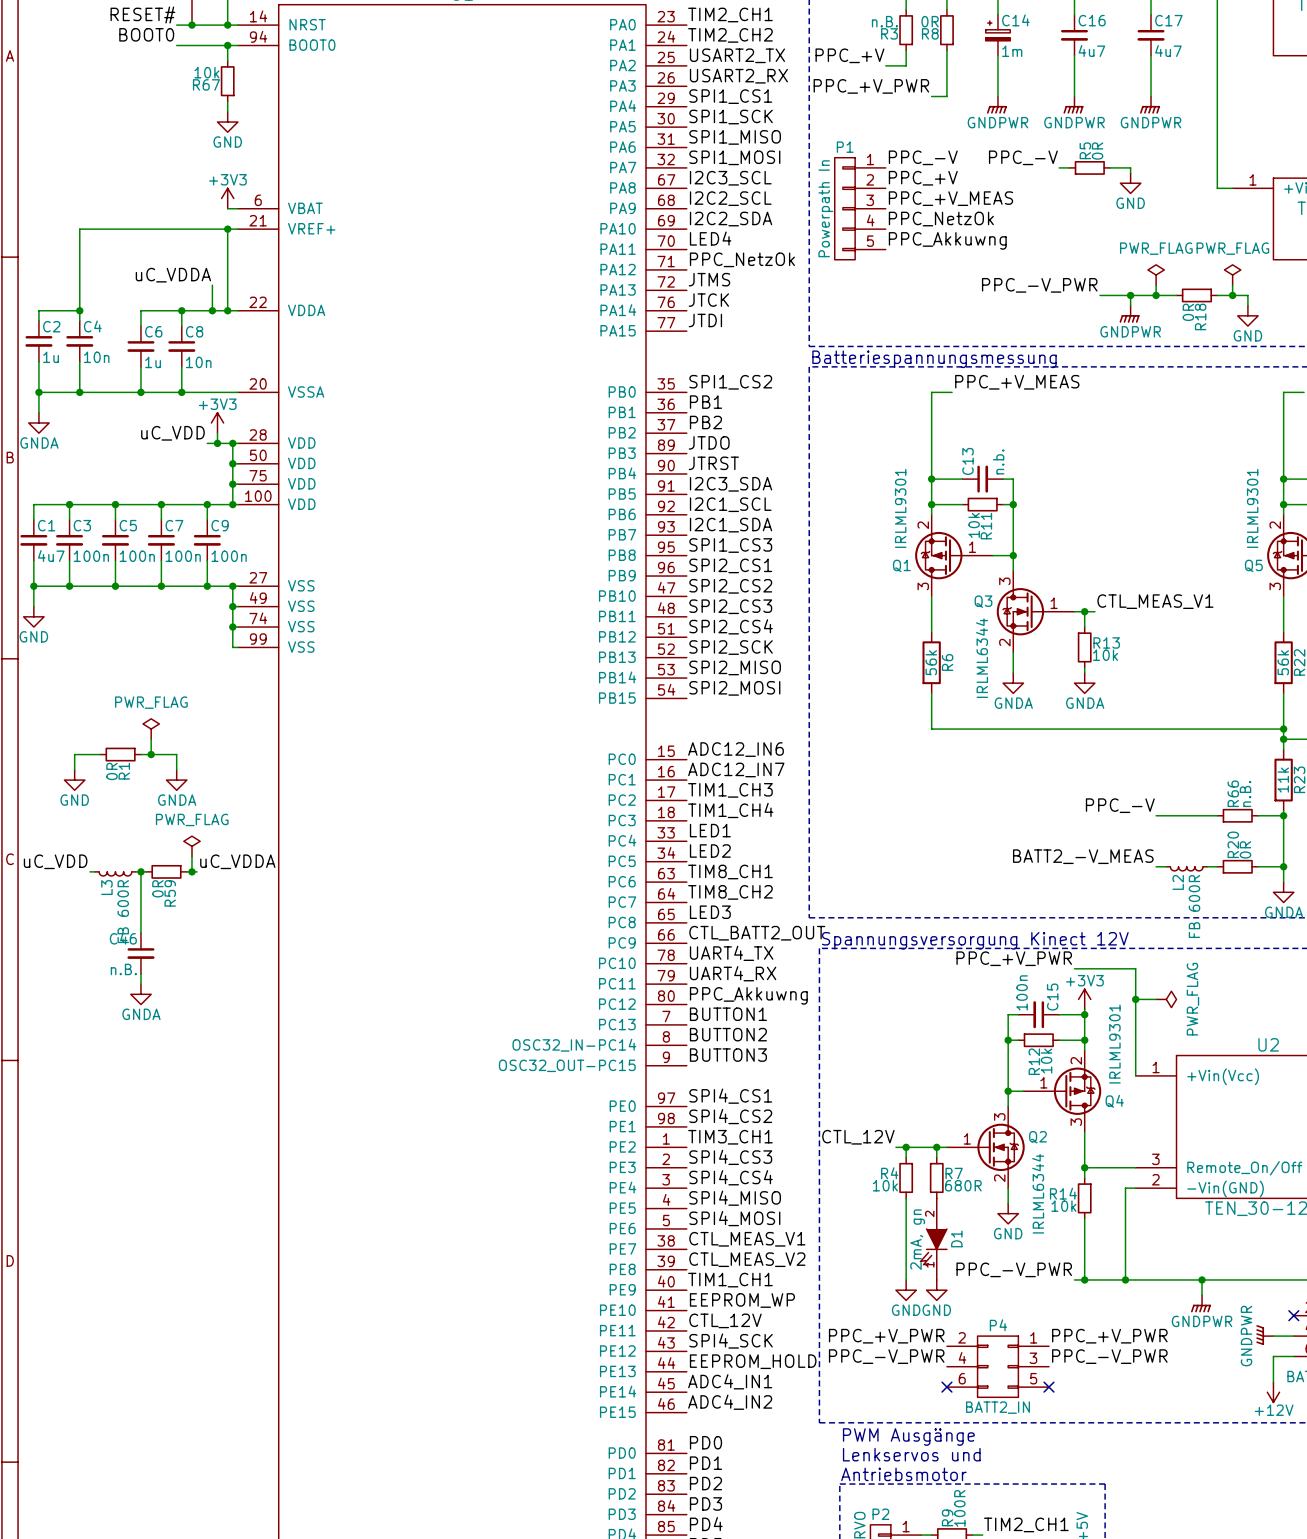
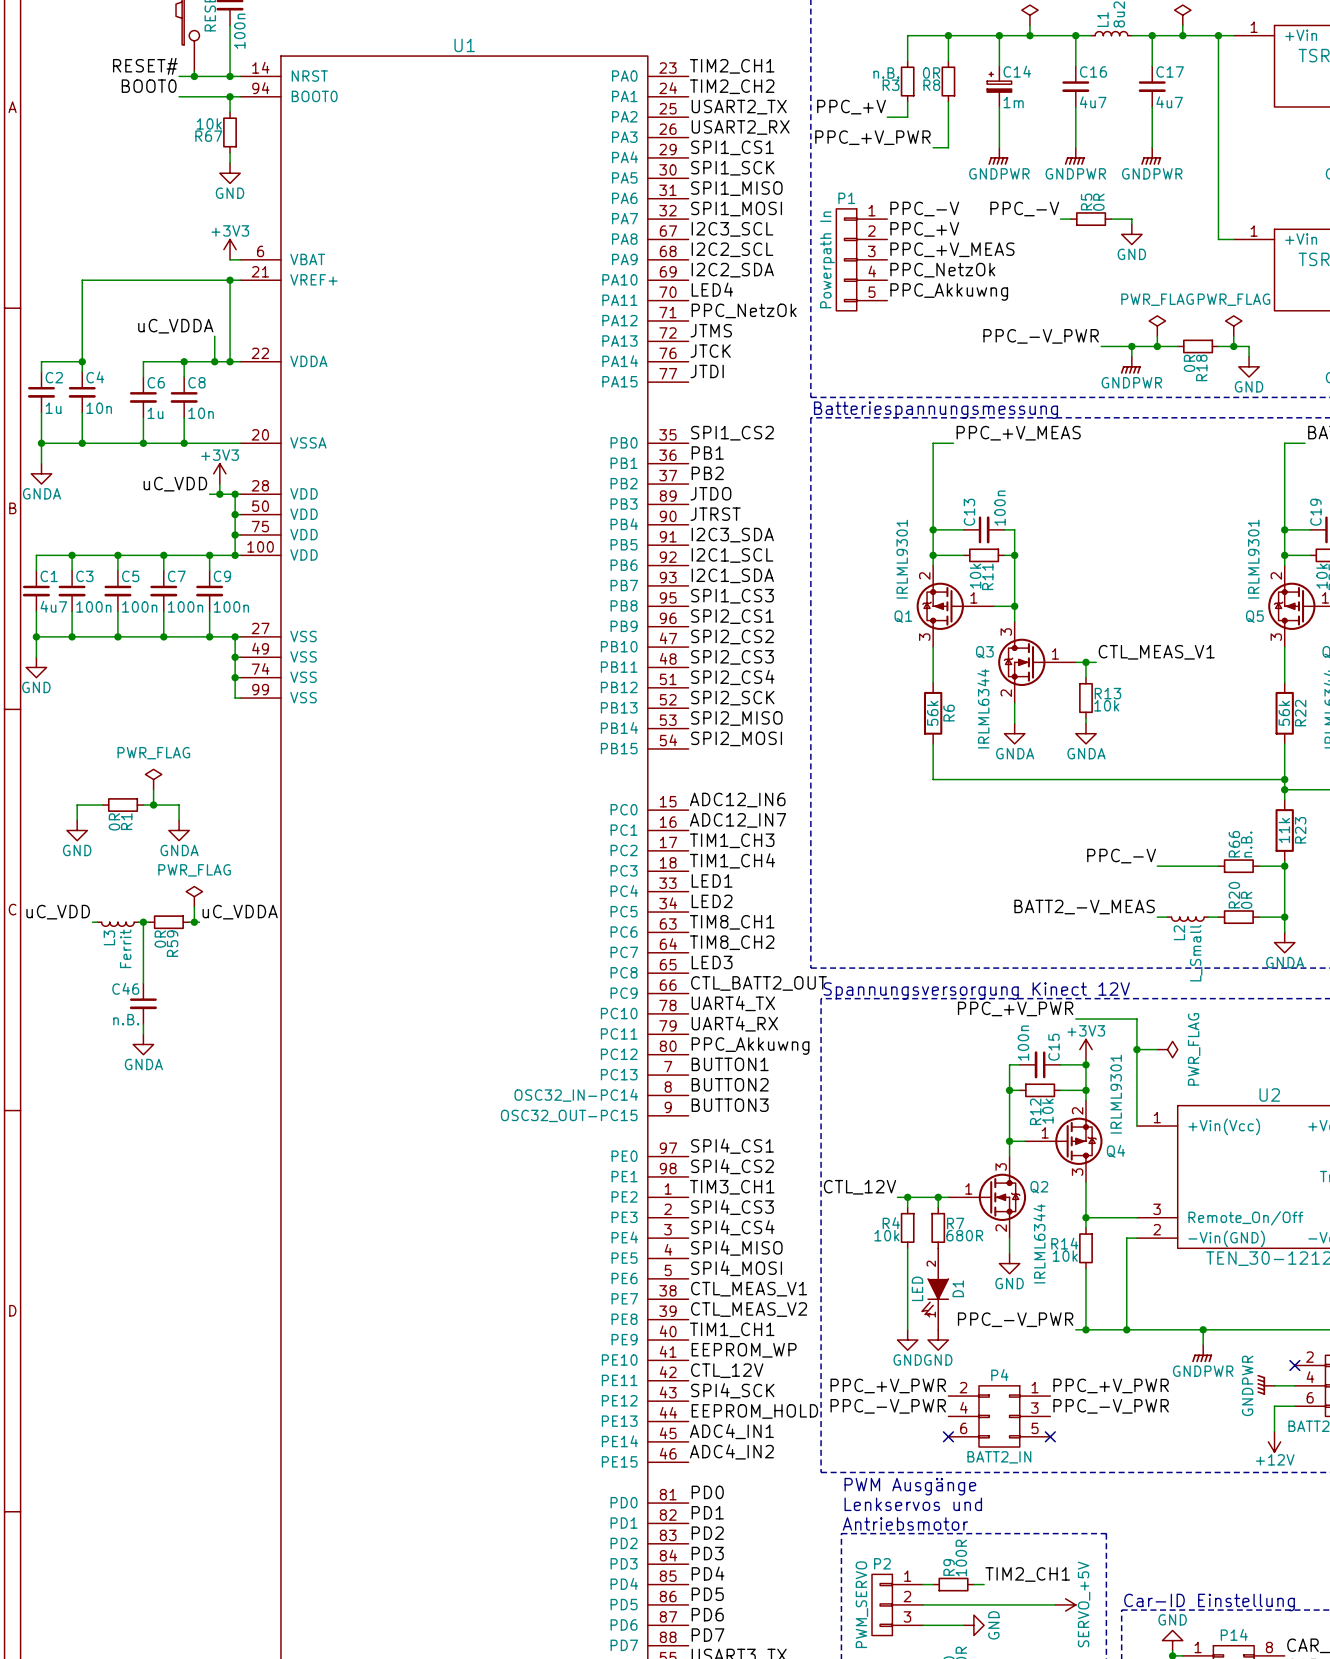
C13 value: n.b. (998, 461) -> 100n (1000, 508)
L2 value: FB 600R (1194, 906) -> L_Small (1196, 953)
L3 value: FB 600R (123, 911) -> Ferrit (125, 948)
D1 value: 2mA, gn (917, 1239) -> LED (917, 1288)

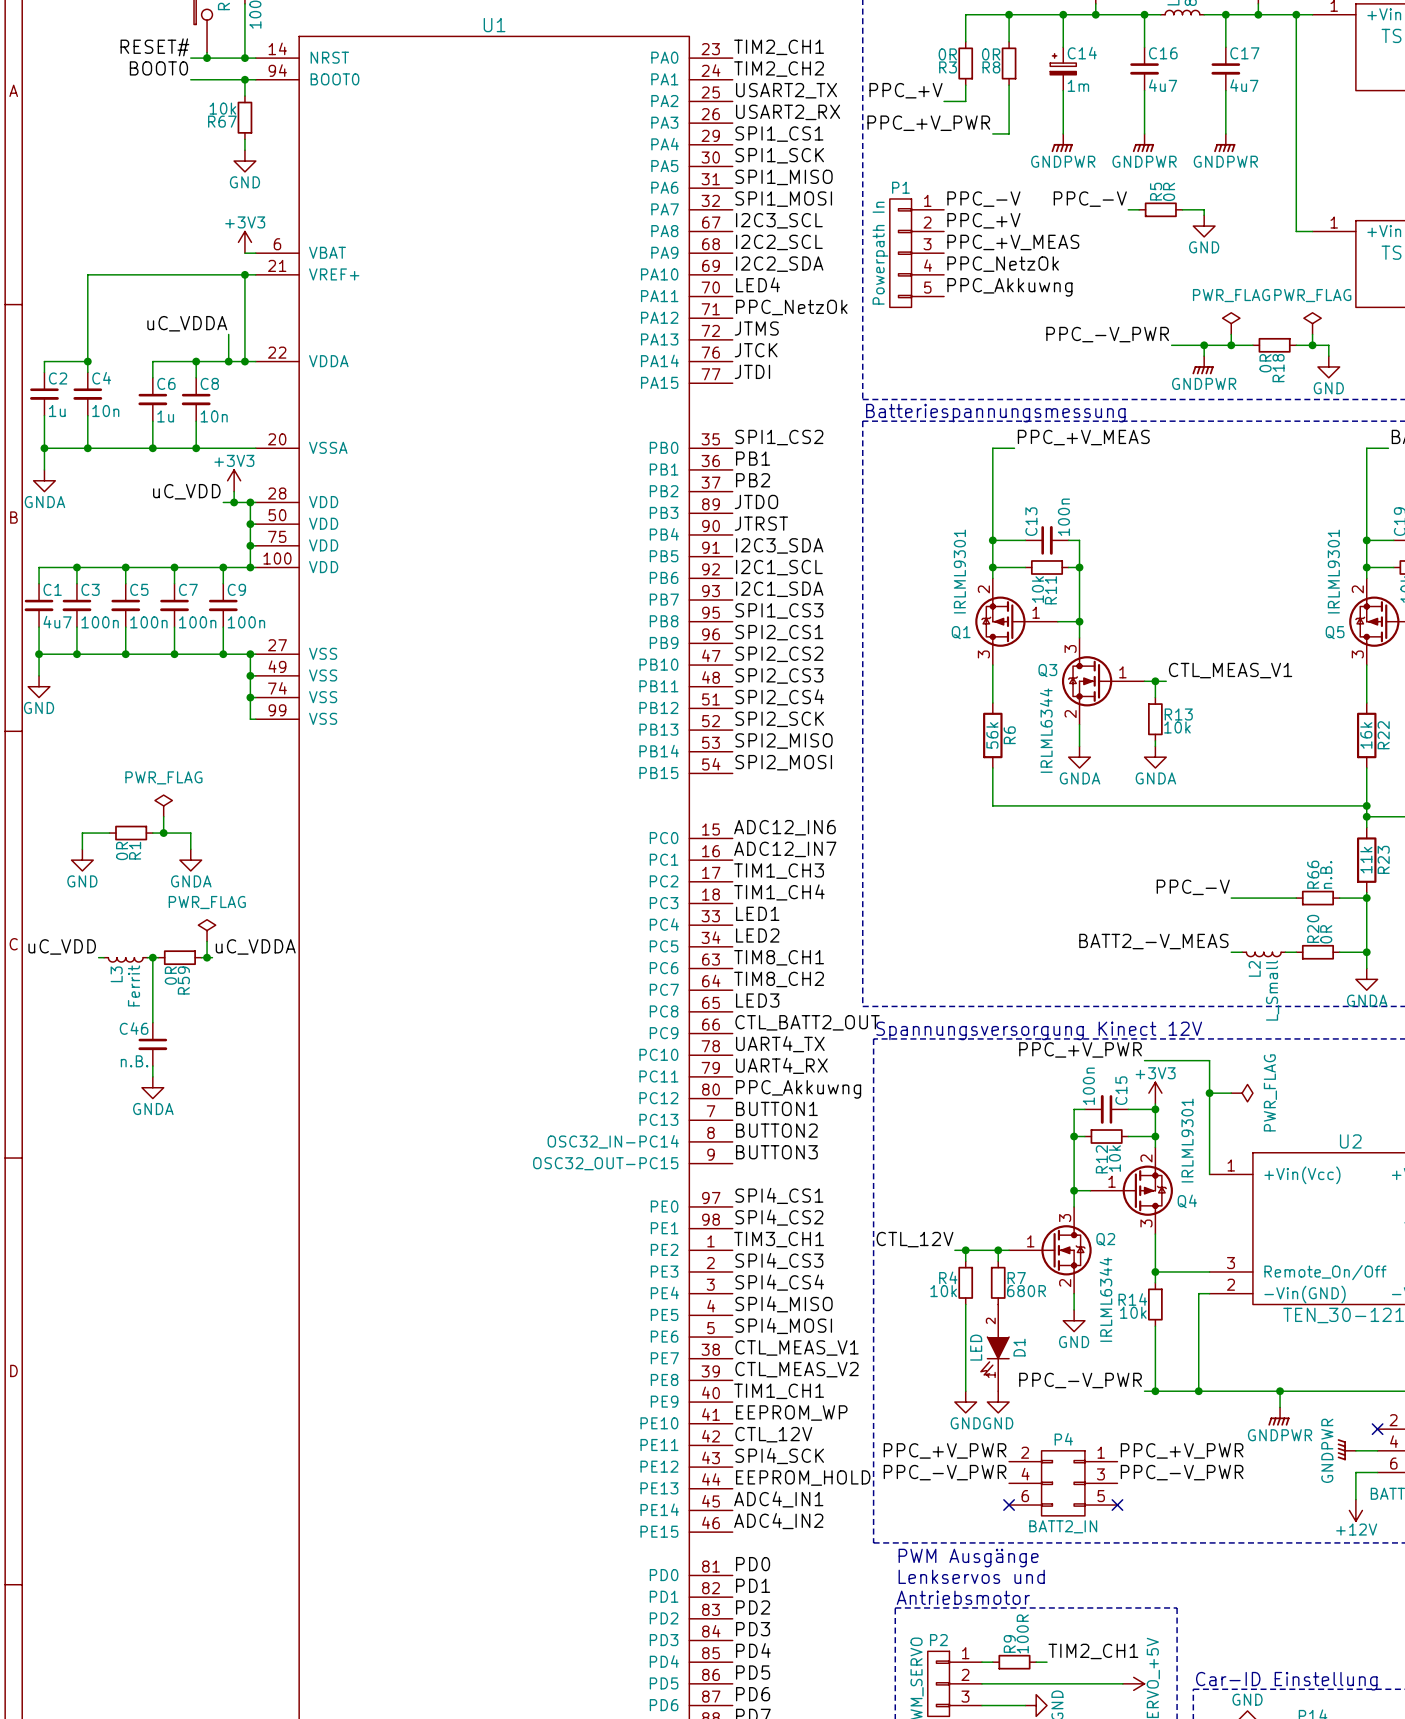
R3 value: n.B. (886, 72) -> 0R (947, 54)
R22 value: 56k (1284, 713) -> 16k (1366, 735)

